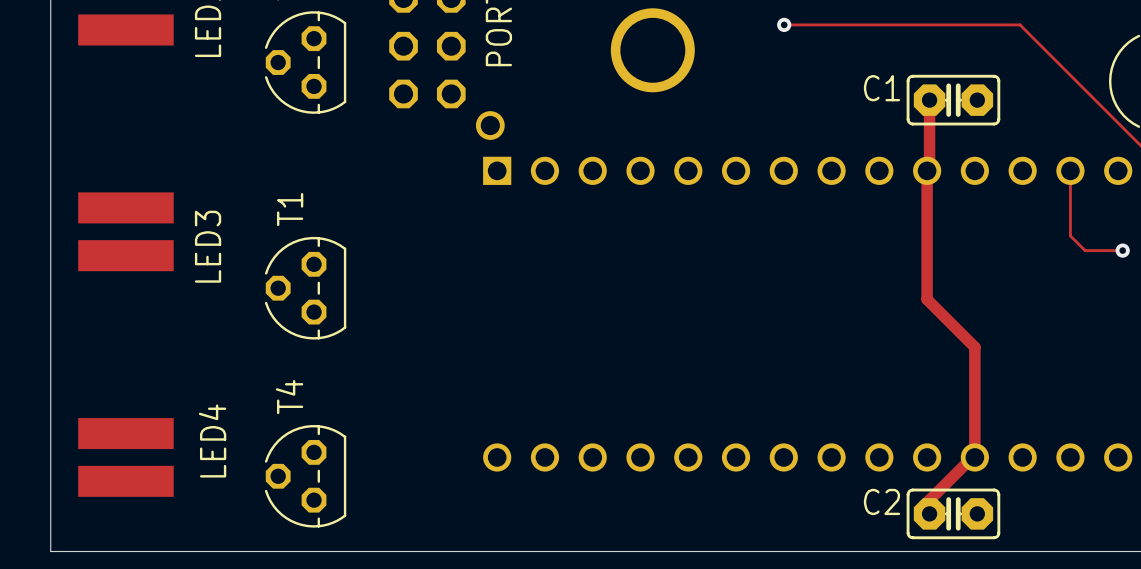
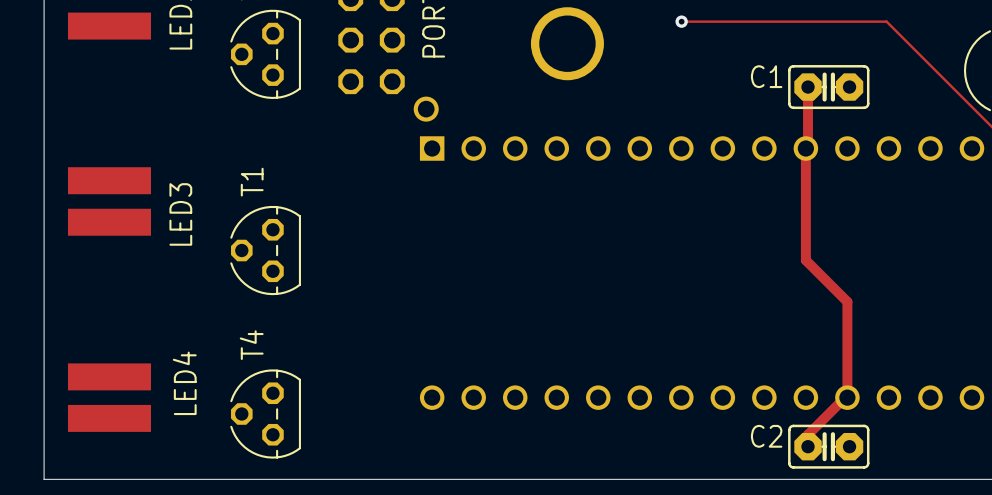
track: (1070, 170) (1070, 235) (1085, 250) (1122, 250) -> none
via: (1122, 250) -> none

